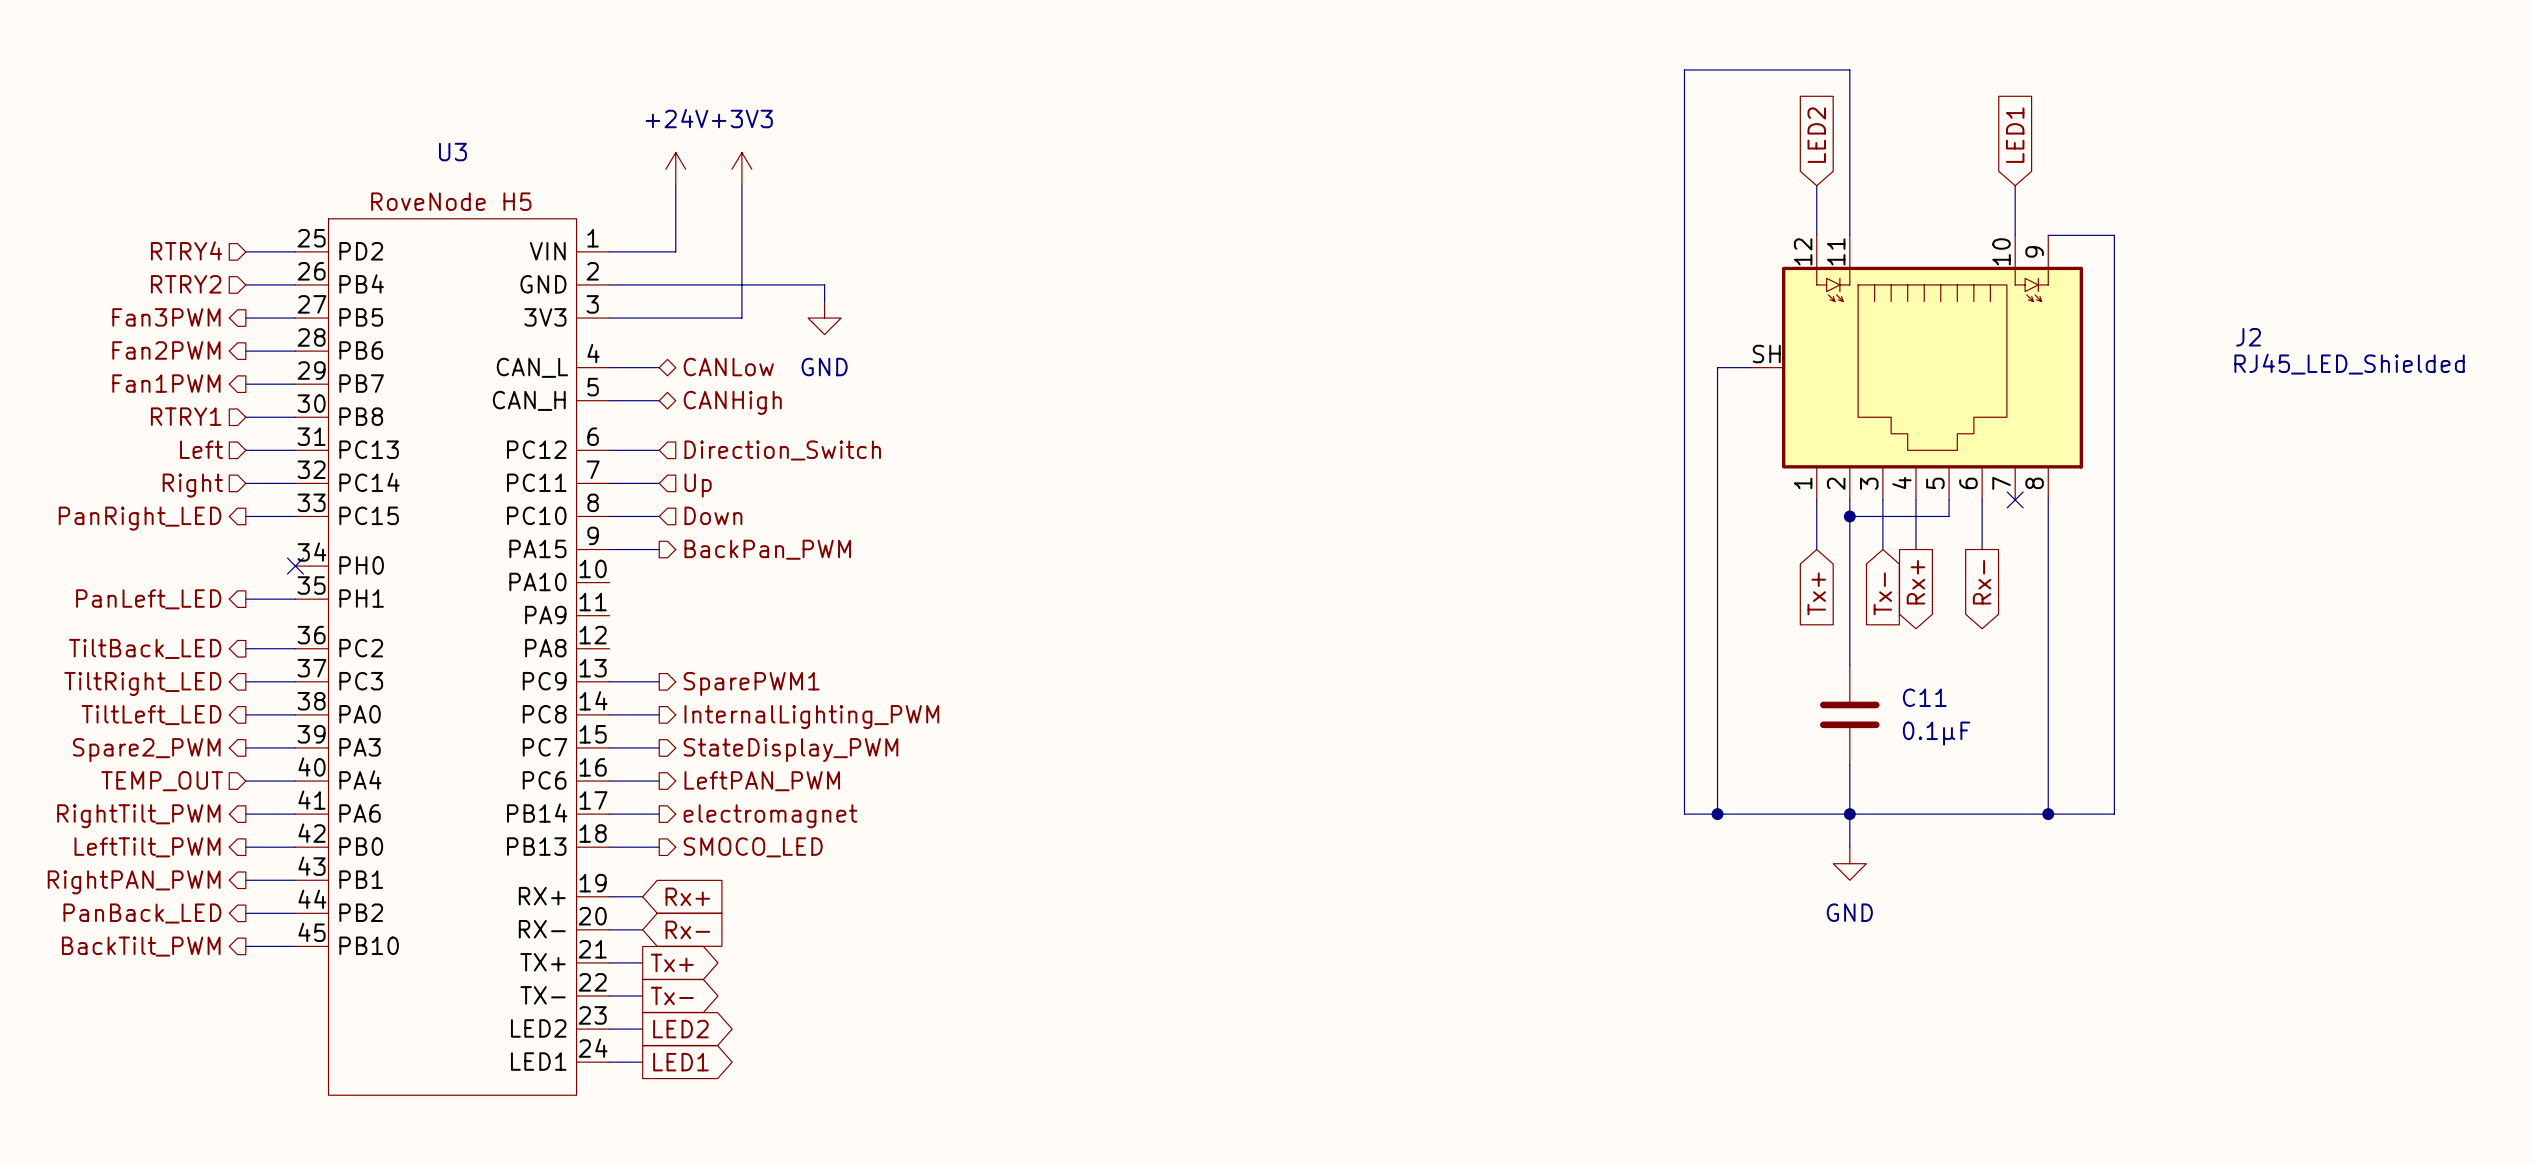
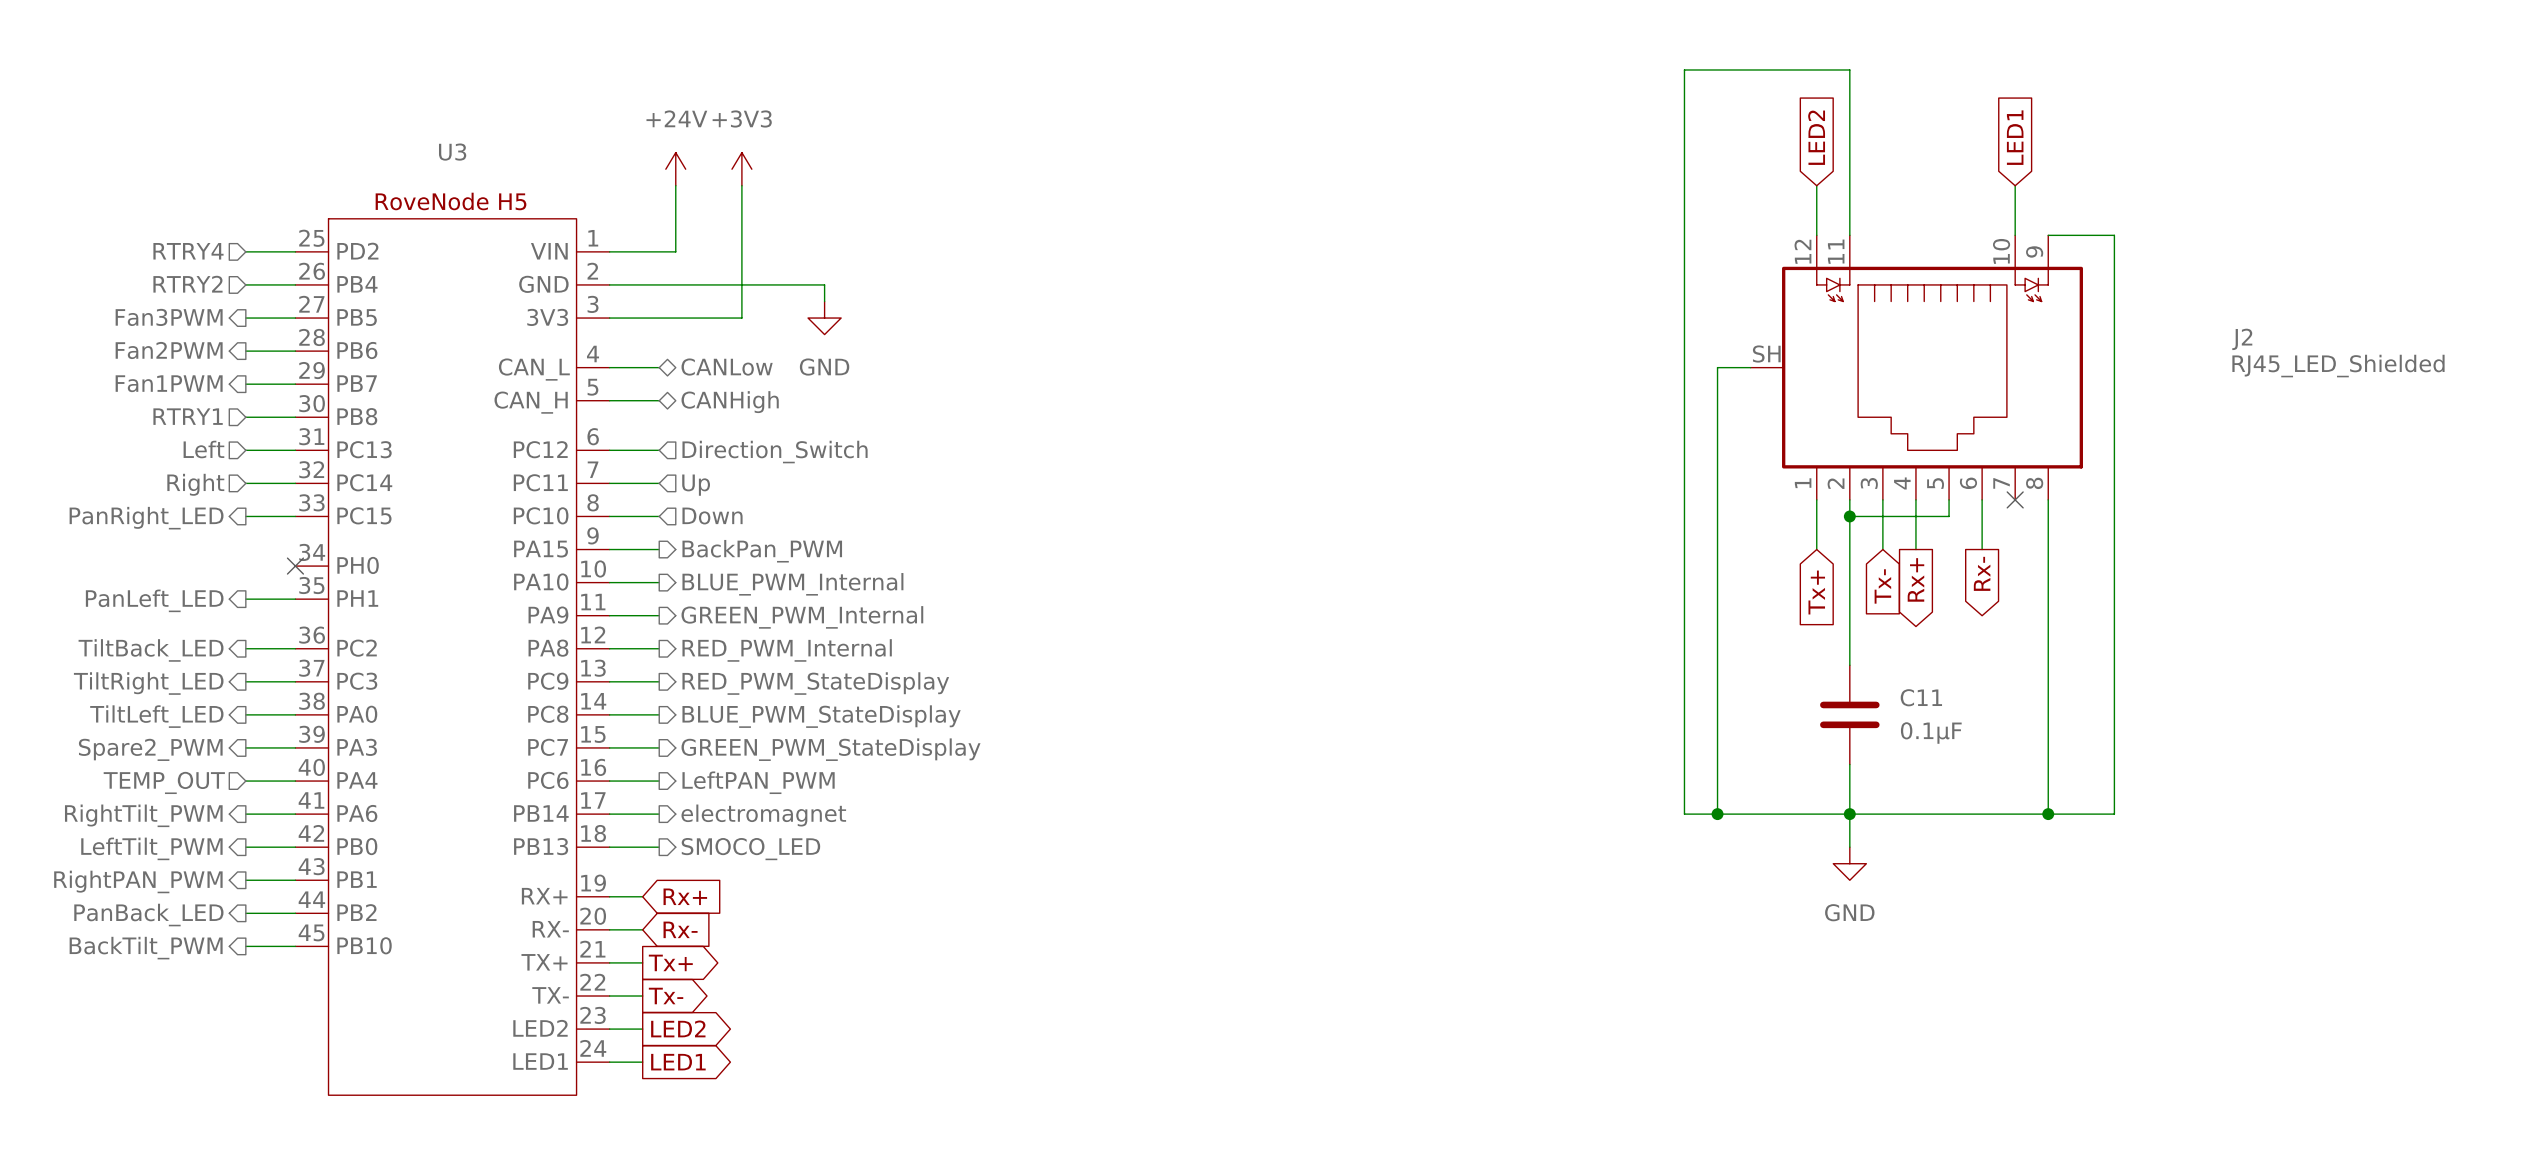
wire: none -> (609, 582) (659, 582)
hierarchical label: none -> BLUE_PWM_Internal (792, 584)
wire: none -> (609, 615) (659, 615)
hierarchical label: none -> GREEN_PWM_Internal (802, 617)
wire: none -> (609, 648) (659, 648)
hierarchical label: none -> RED_PWM_Internal (787, 650)
hierarchical label: SparePWM1 (751, 683) -> RED_PWM_StateDisplay (815, 683)
hierarchical label: InternalLighting_PWM (811, 717) -> BLUE_PWM_StateDisplay (821, 716)
hierarchical label: StateDisplay_PWM (790, 750) -> GREEN_PWM_StateDisplay (831, 749)

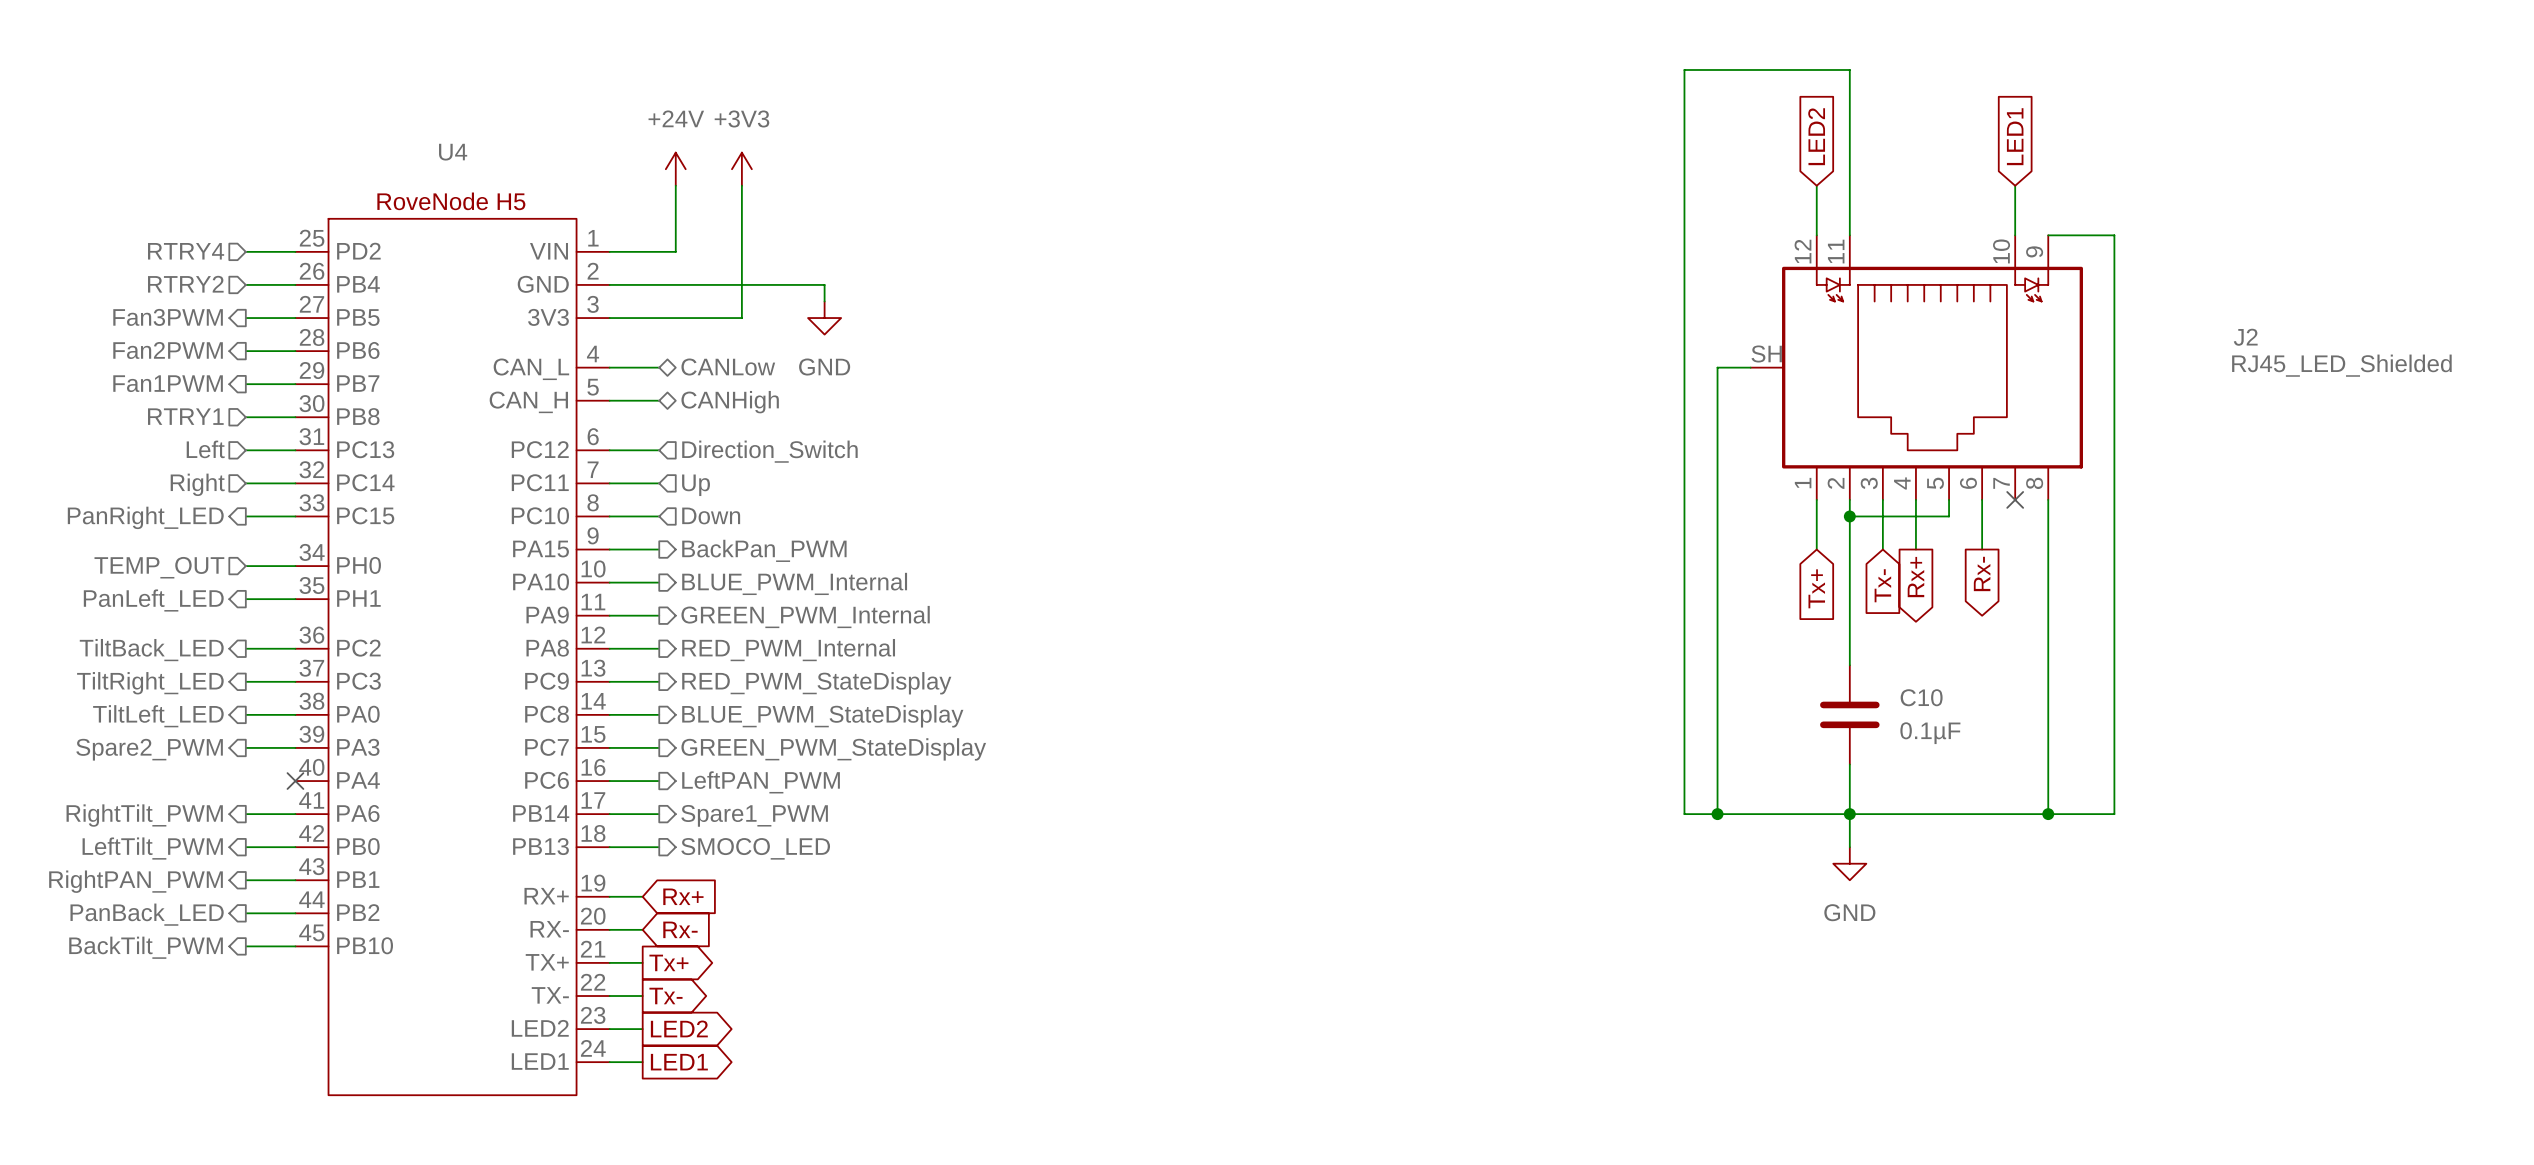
U3 name: U3 (452, 152) -> U4 (453, 152)
no-connect mark: (295, 566) -> none
C11 name: C11 (1921, 697) -> C10 (1921, 697)
wire: (245, 781) (295, 781) -> (245, 566) (295, 566)
no-connect mark: none -> (295, 781)
hierarchical label position: TEMP_OUT (164, 782) -> TEMP_OUT (159, 567)
hierarchical label: electromagnet (763, 815) -> Spare1_PWM (754, 815)

